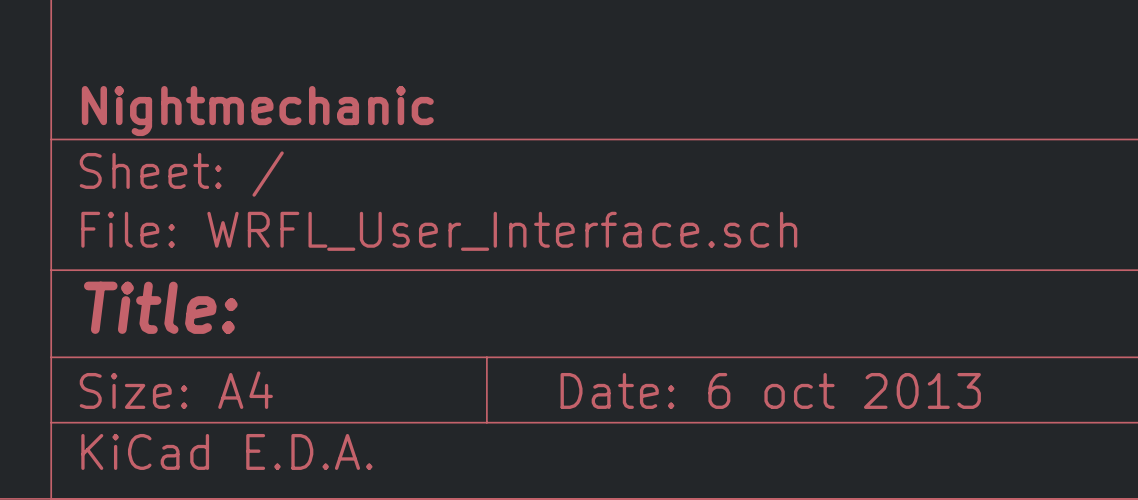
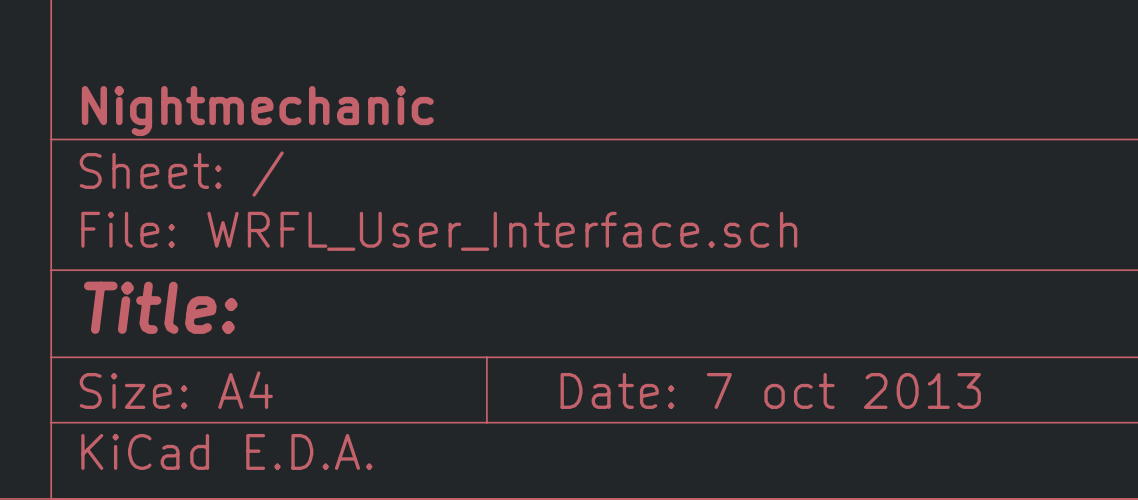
title block: Date: 6 oct 2013 (770, 390) -> Date: 7 oct 2013 (770, 390)

